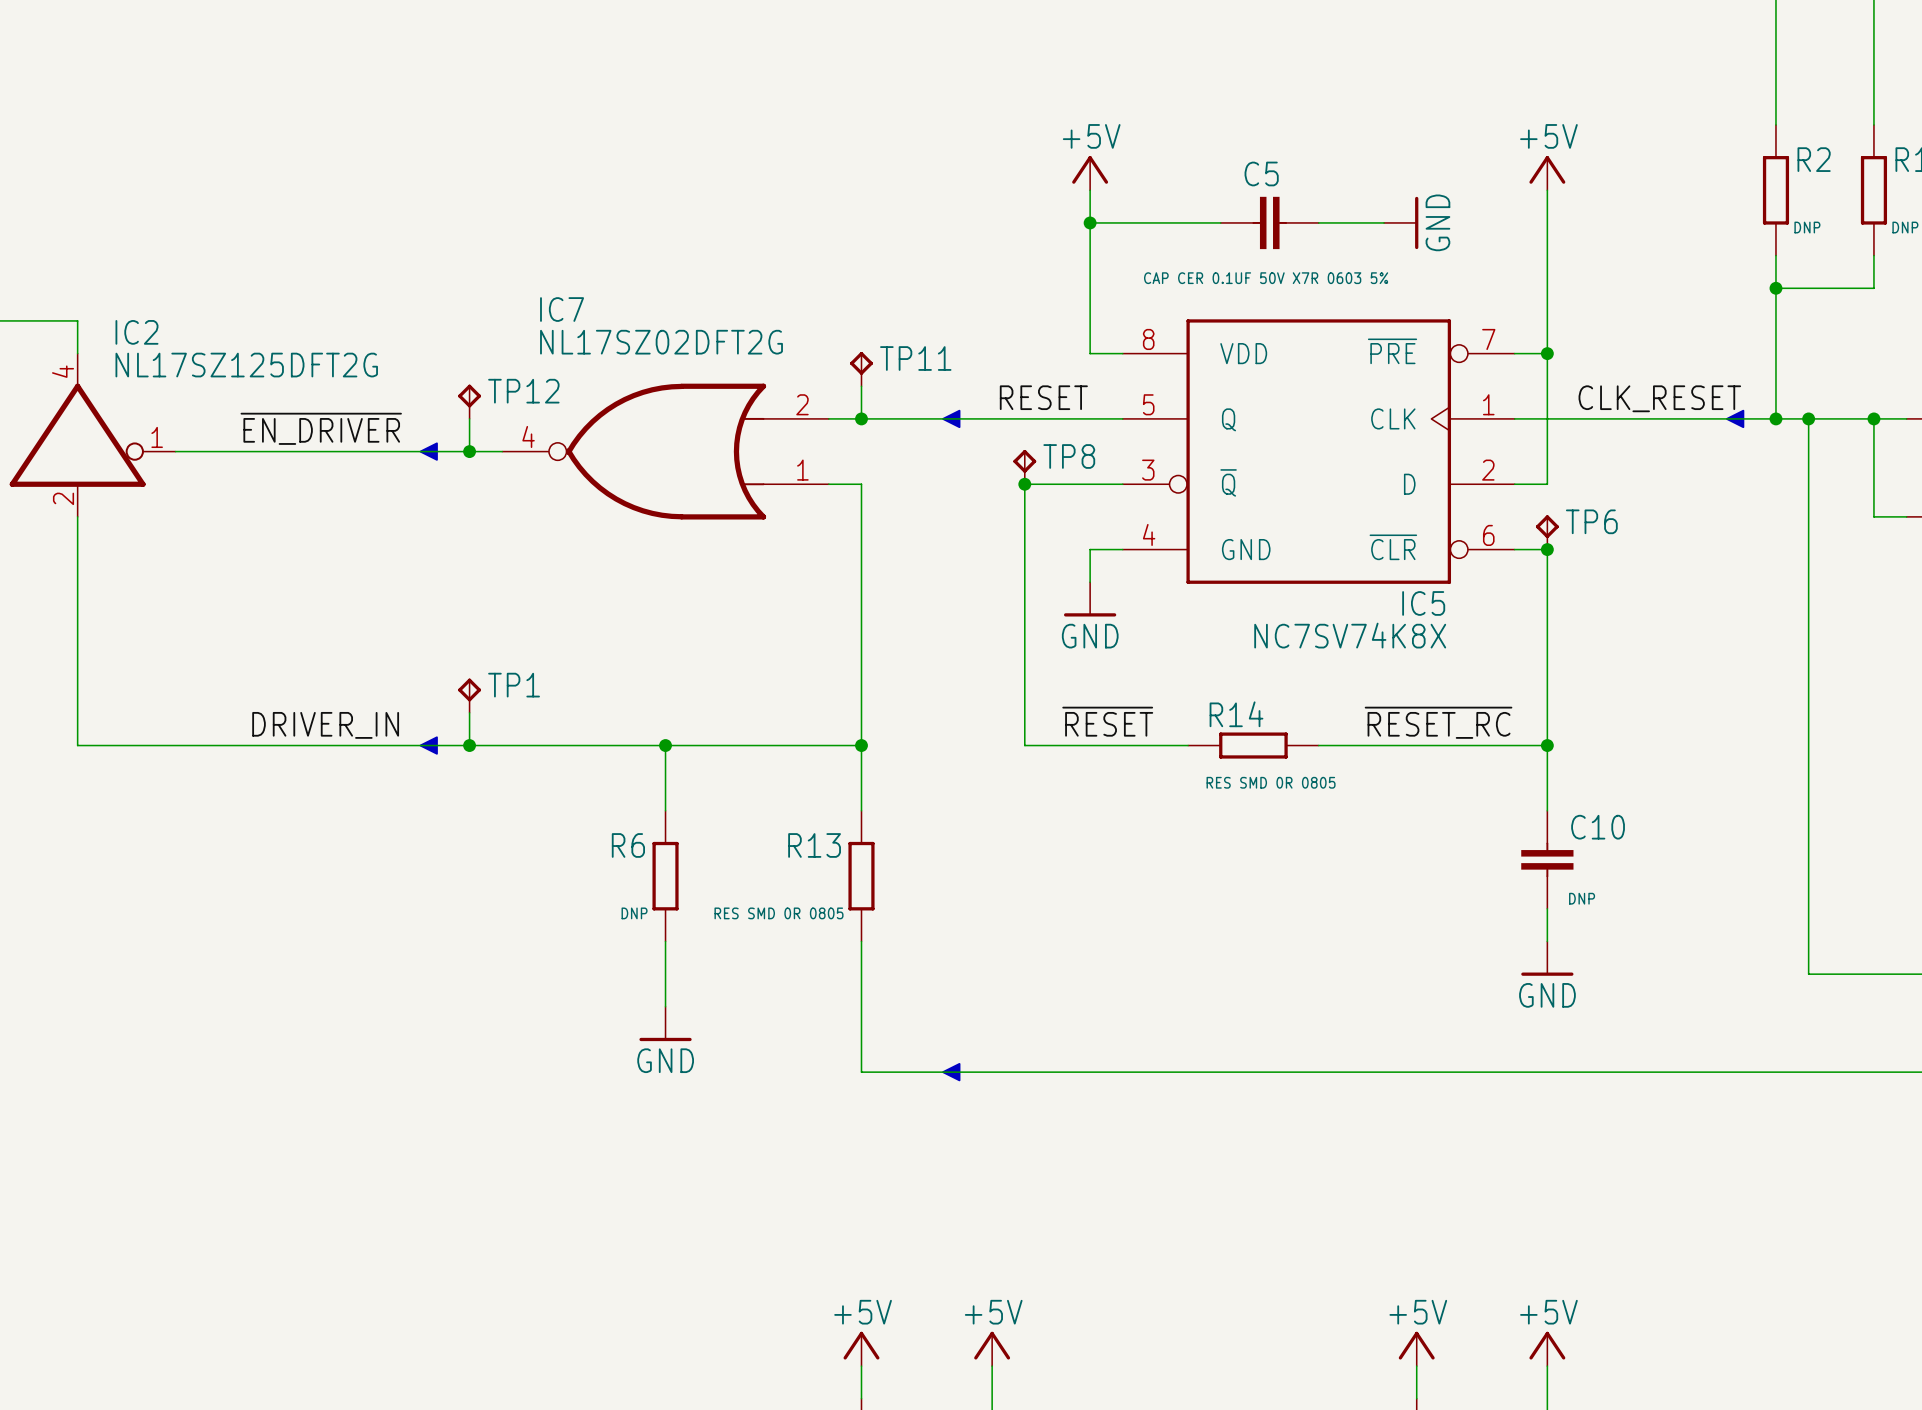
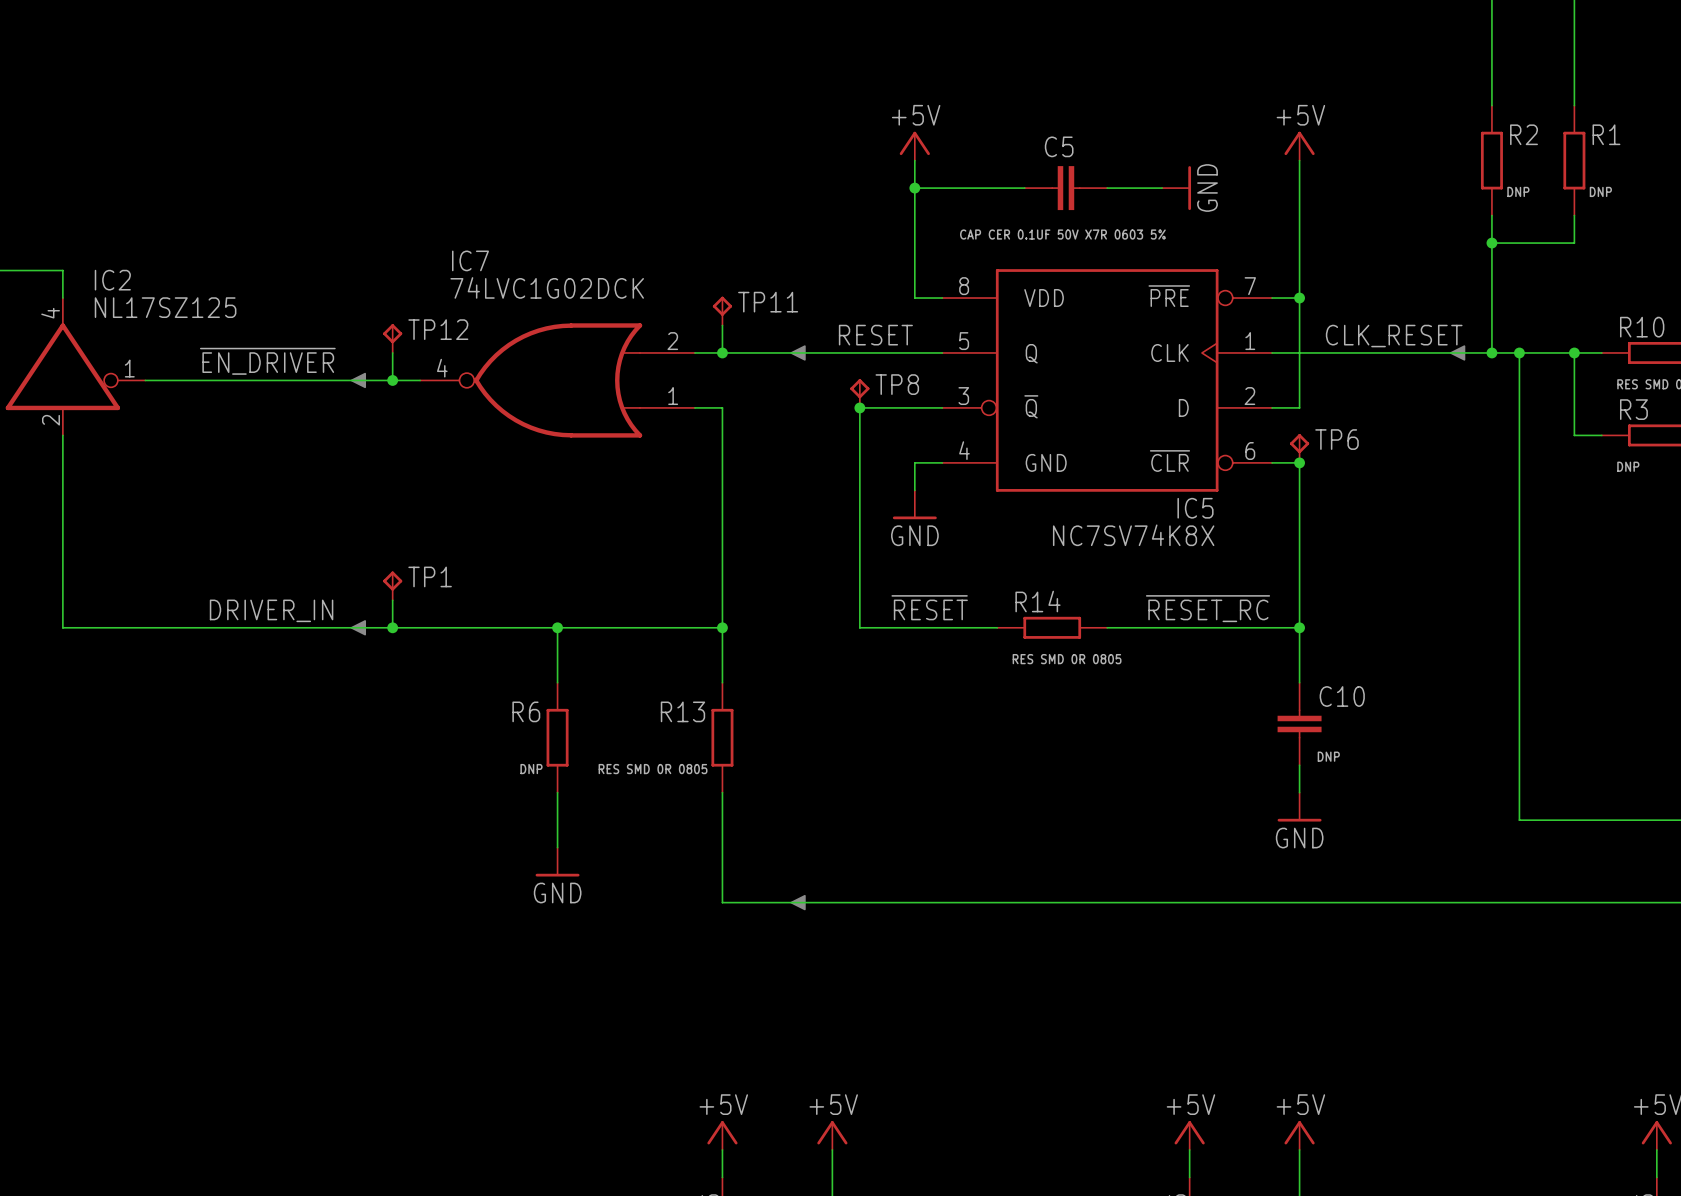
IC7 value: NL17SZ02DFT2G (661, 342) -> 74LVC1G02DCK (547, 287)
IC2 value: NL17SZ125DFT2G (246, 365) -> NL17SZ125 (165, 307)

